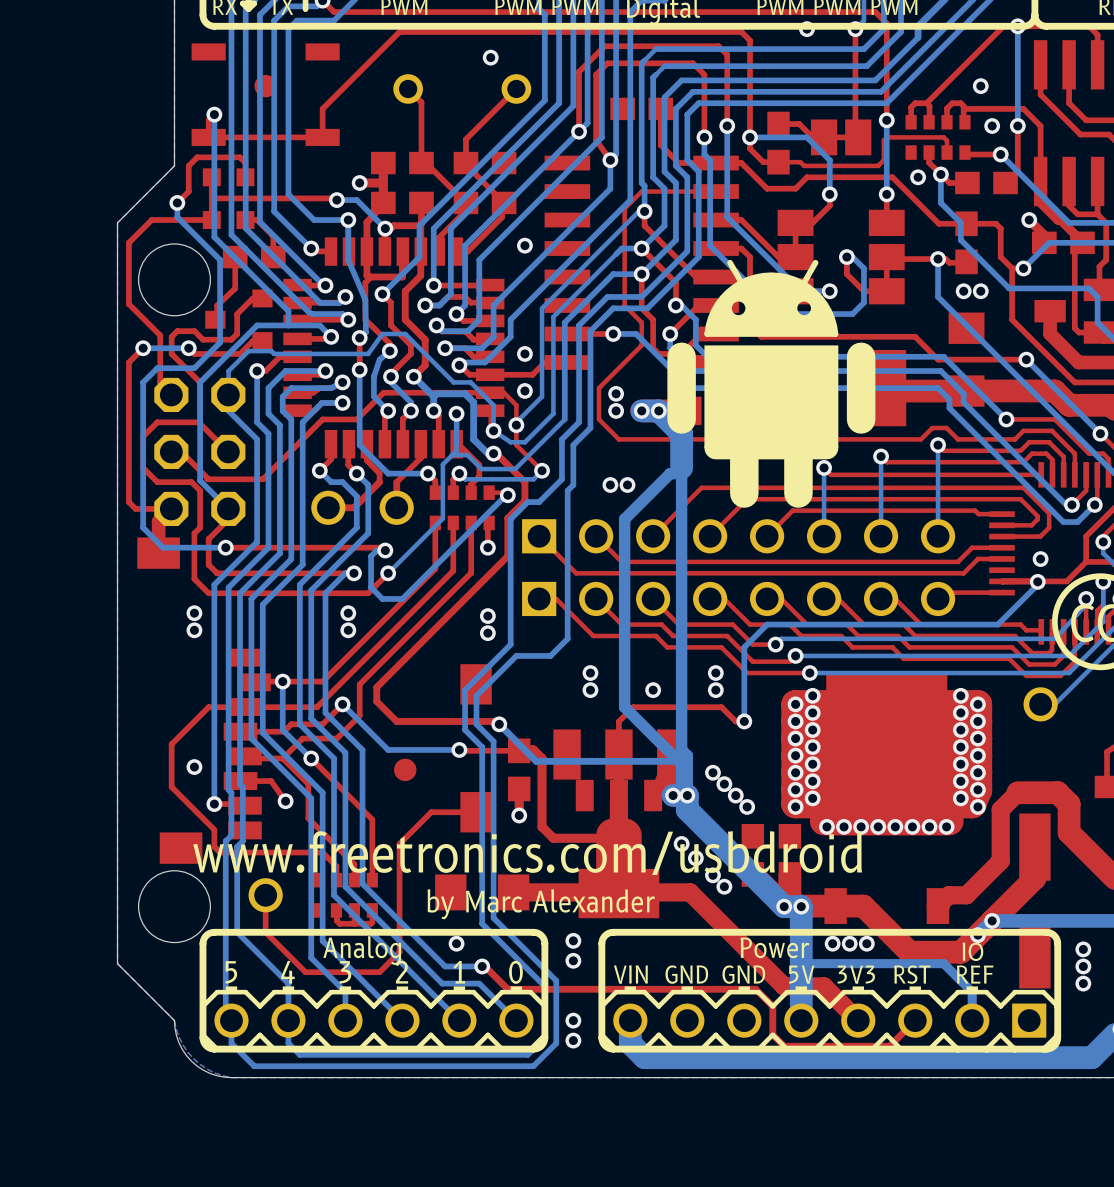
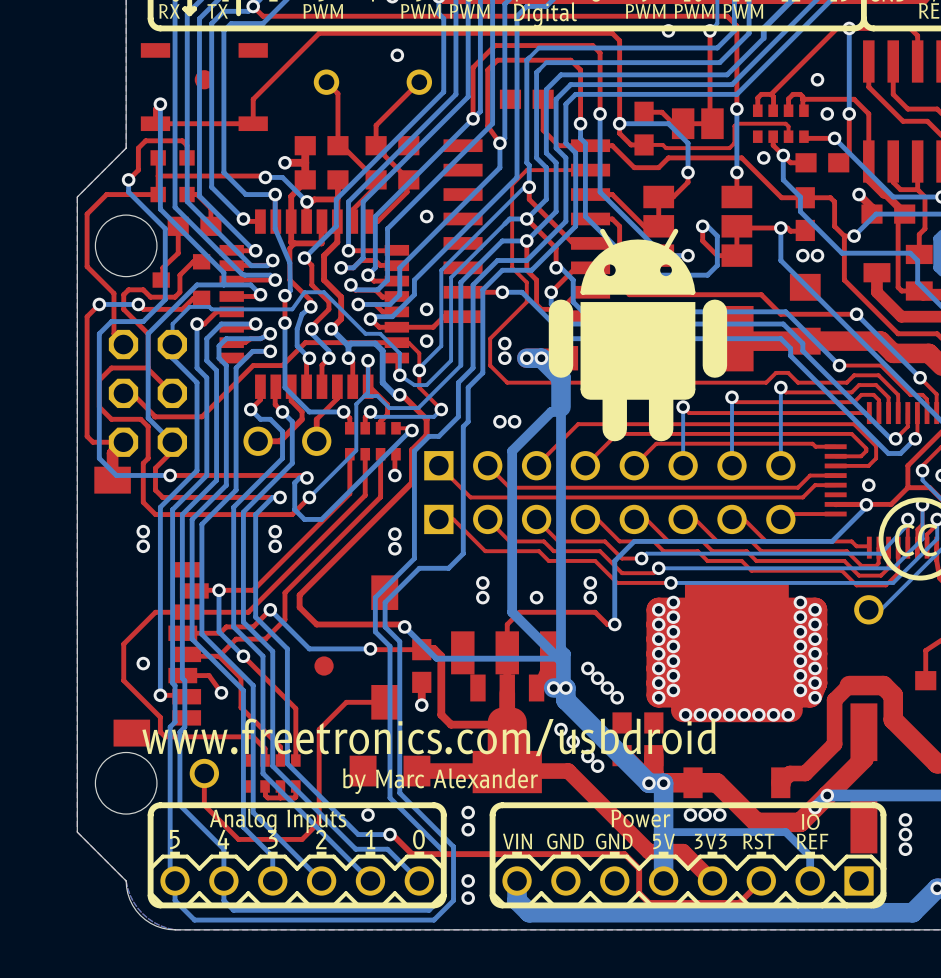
text: Analog (362, 950) -> Analog Inputs (278, 820)

